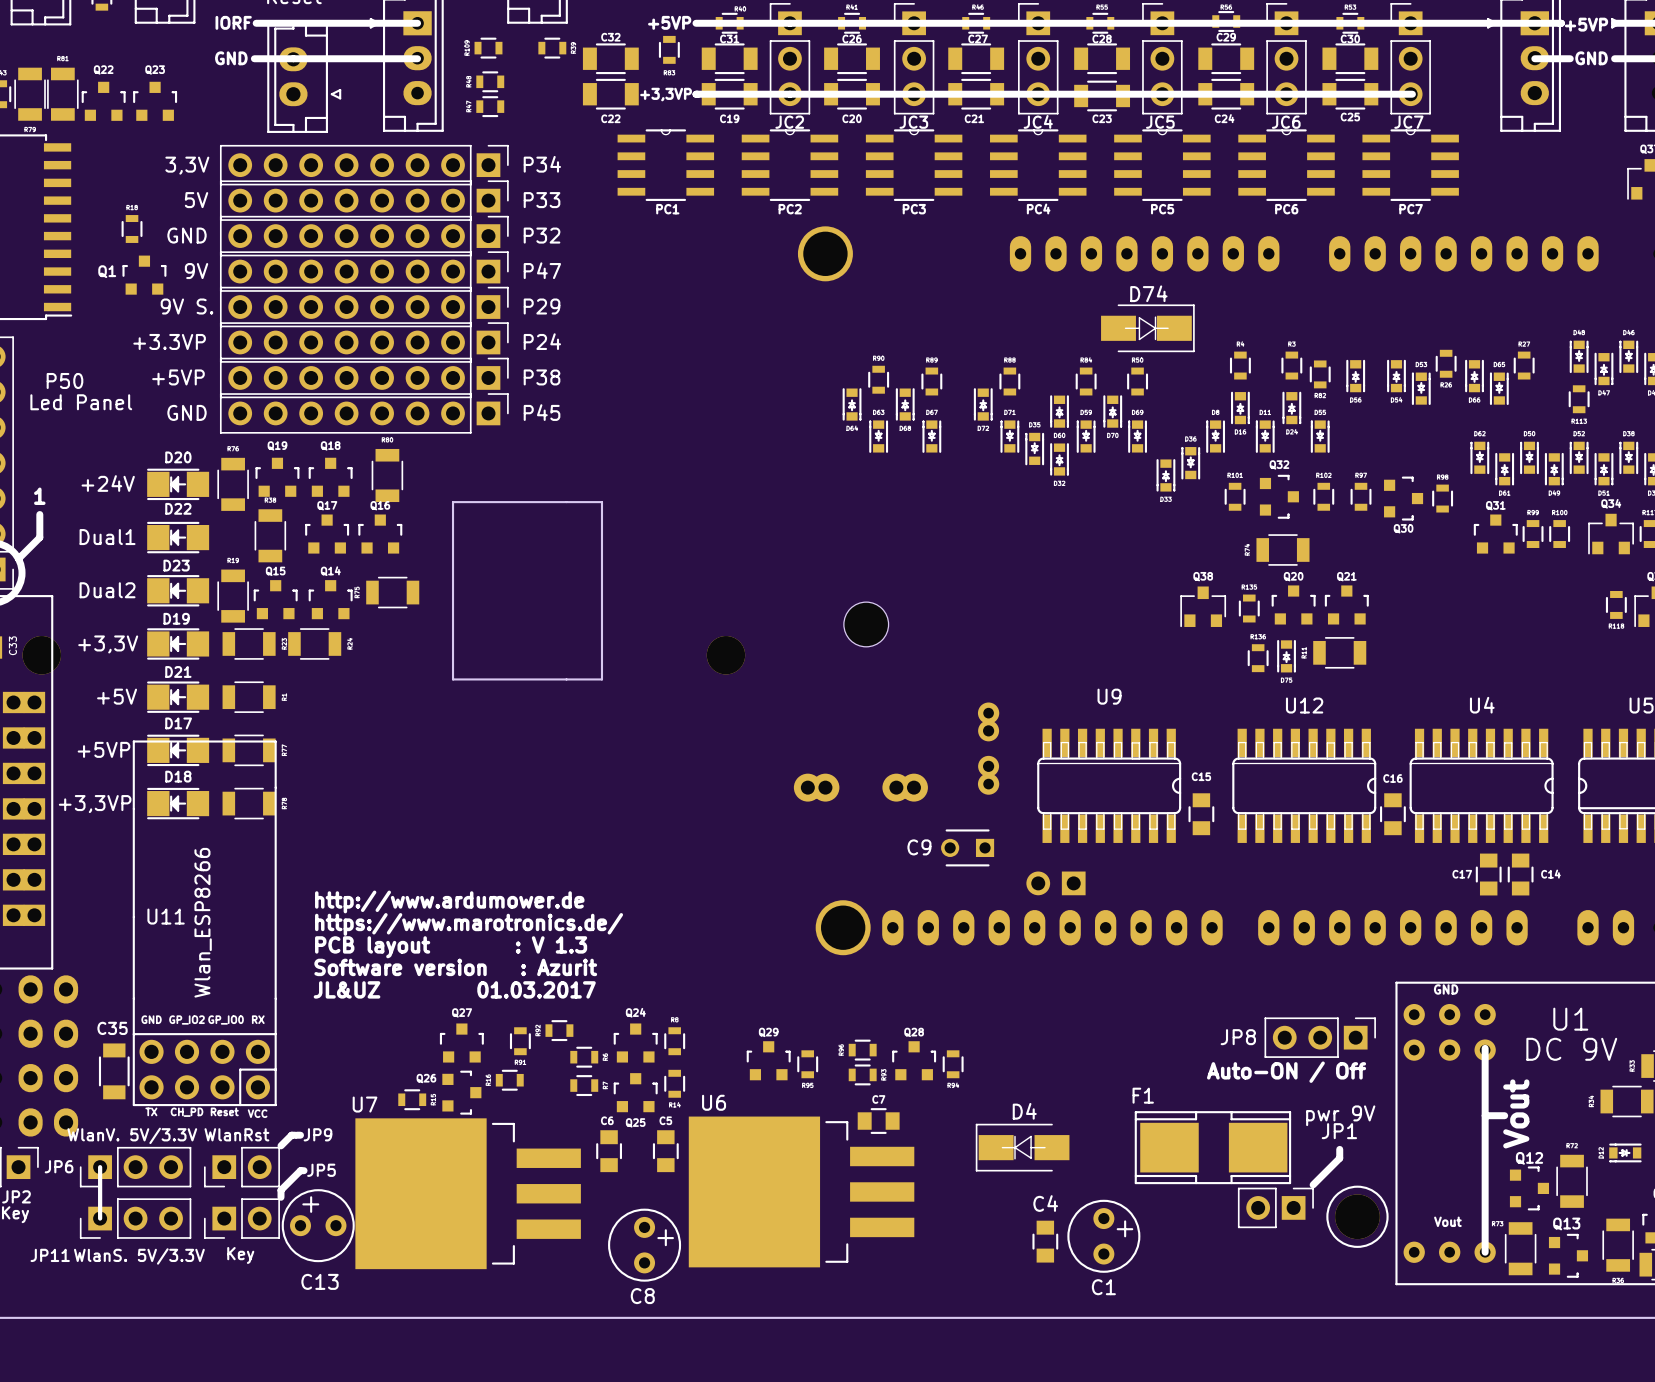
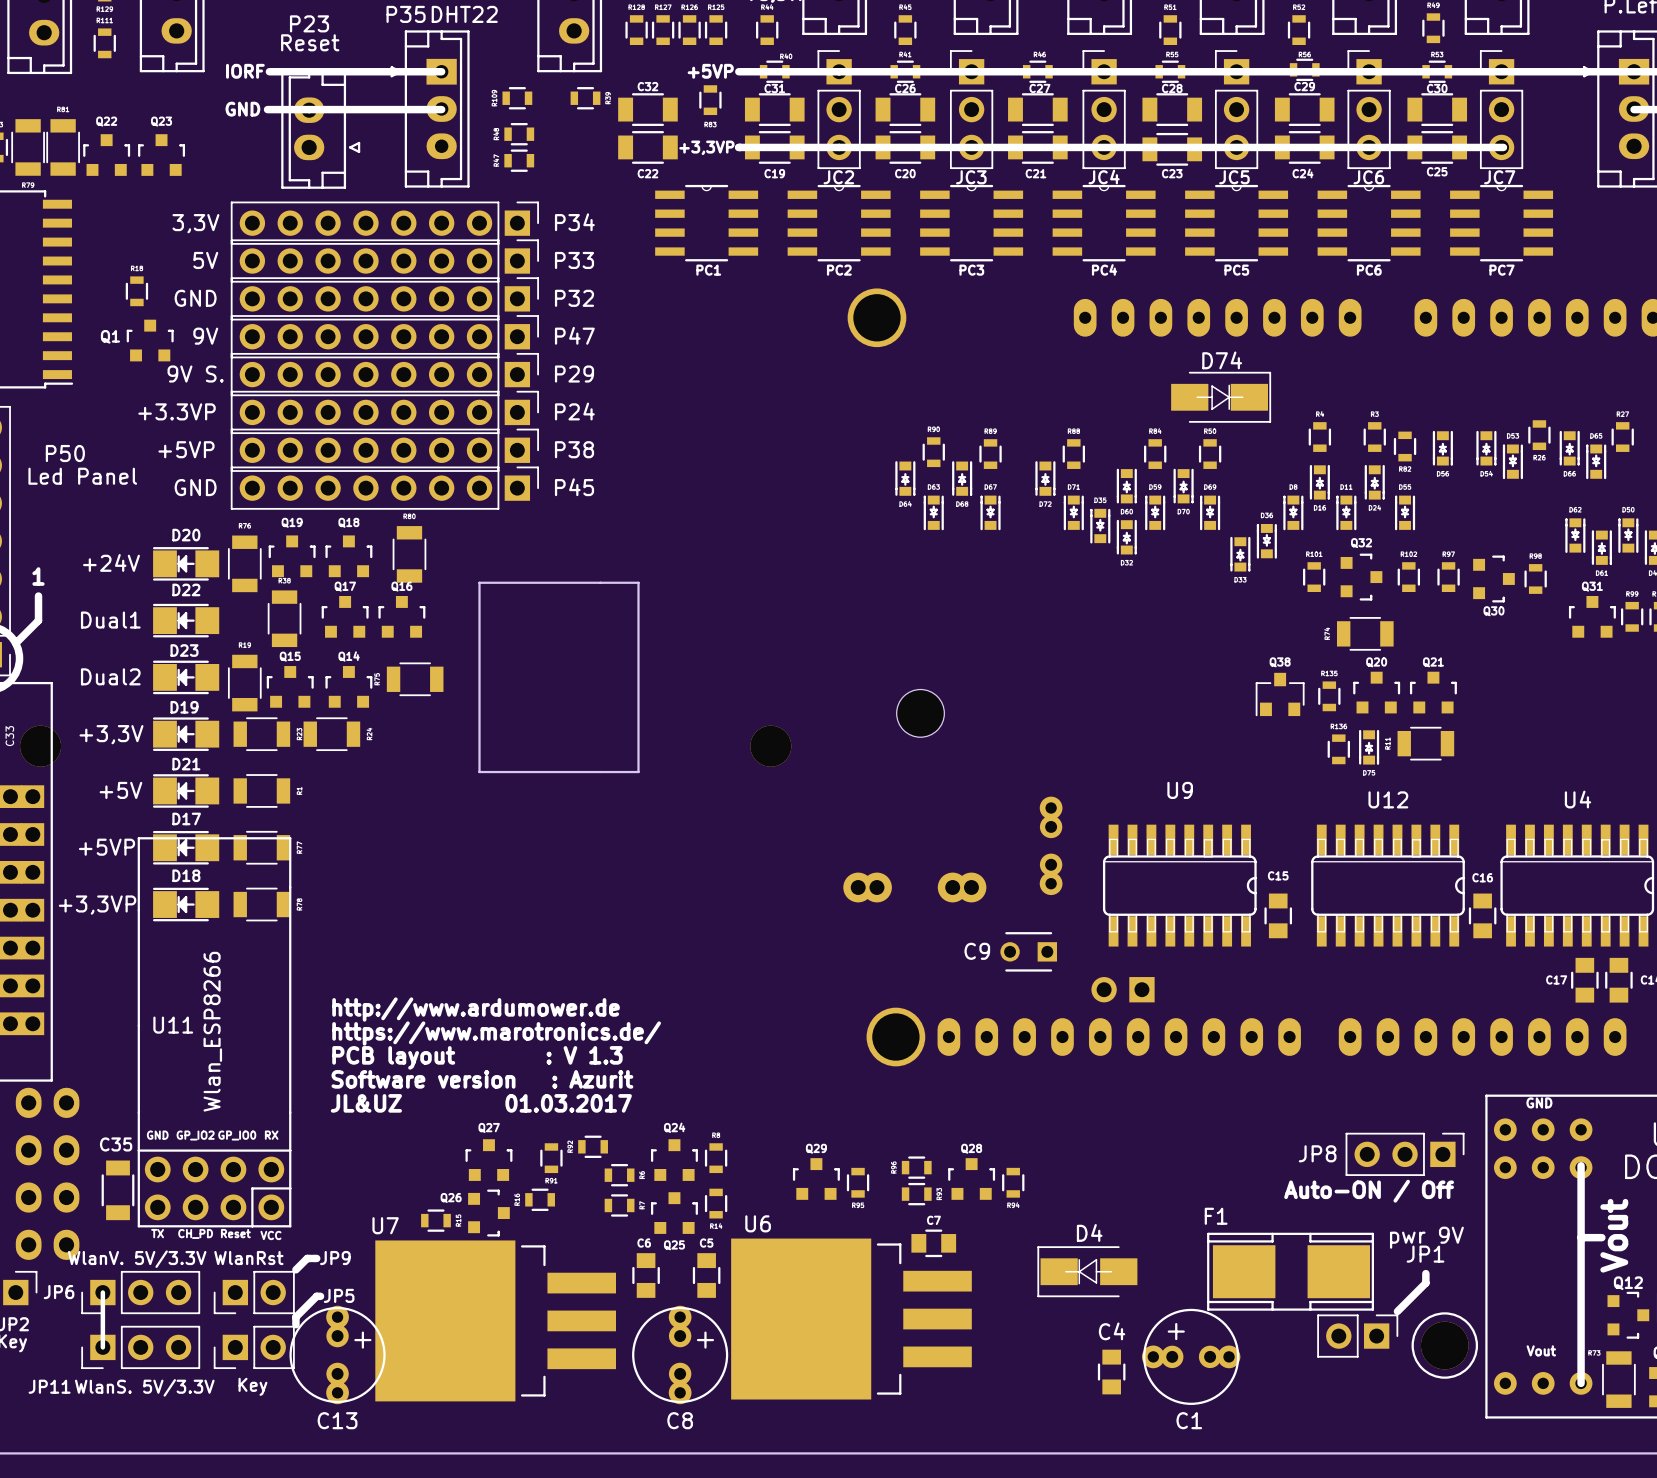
C13 footprint: [281, 1189, 355, 1263] -> [289, 1305, 386, 1405]
C1 footprint: [1067, 1199, 1141, 1273] -> [1141, 1308, 1241, 1405]
C8 footprint: [608, 1208, 682, 1282] -> [632, 1305, 729, 1405]

